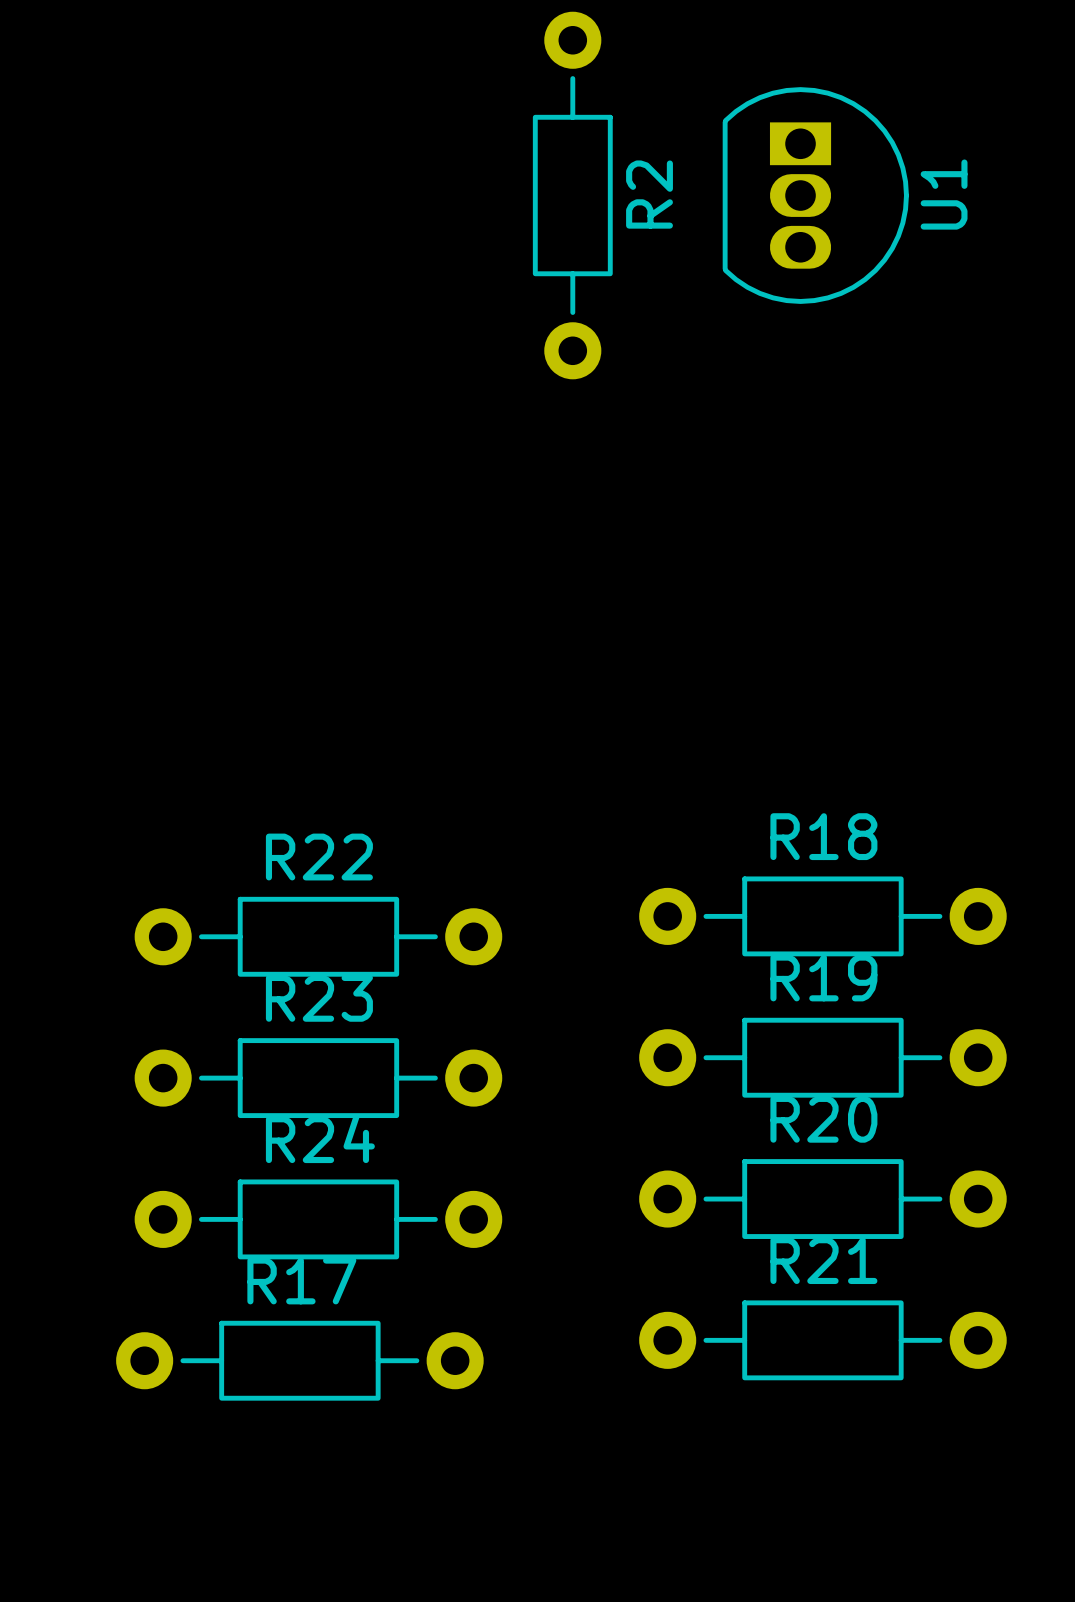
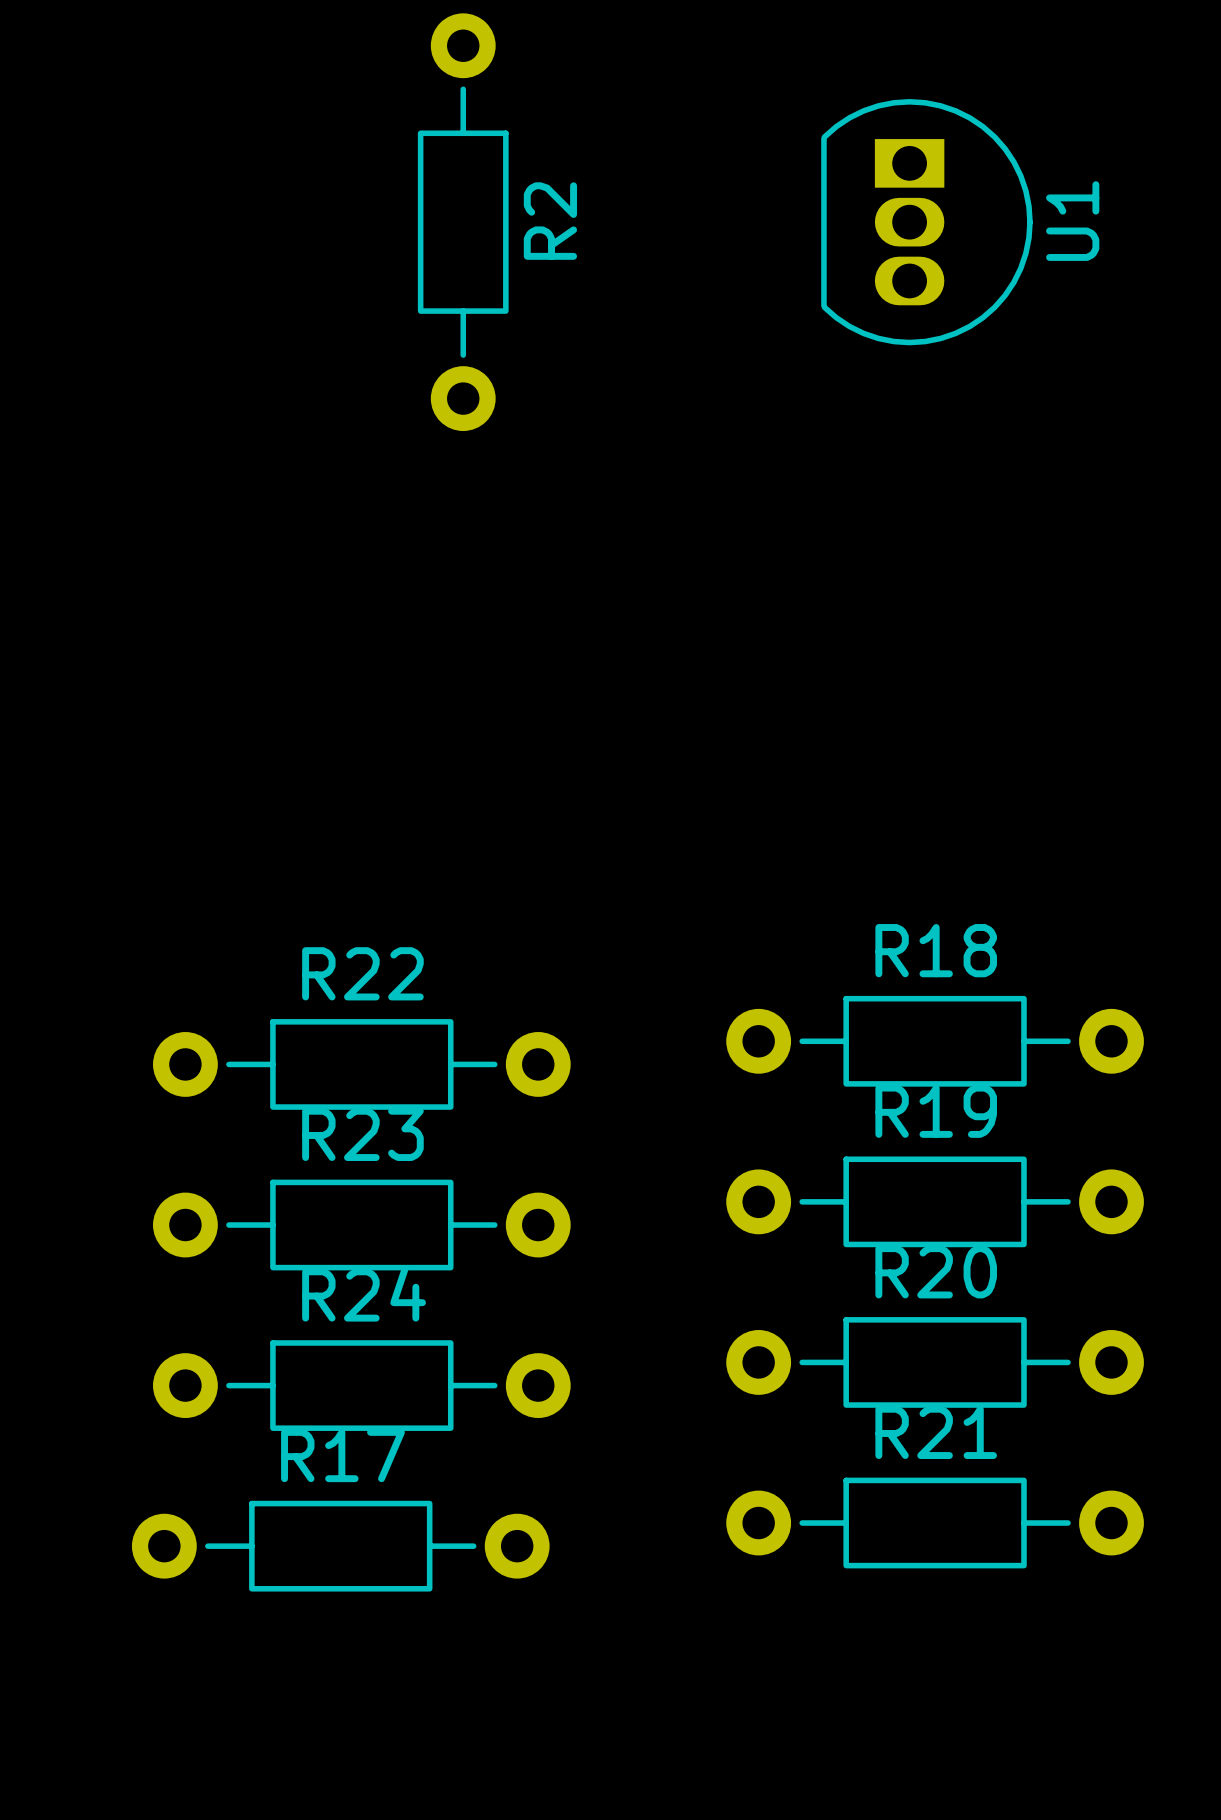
R2 position: (572, 195) -> (463, 222)

